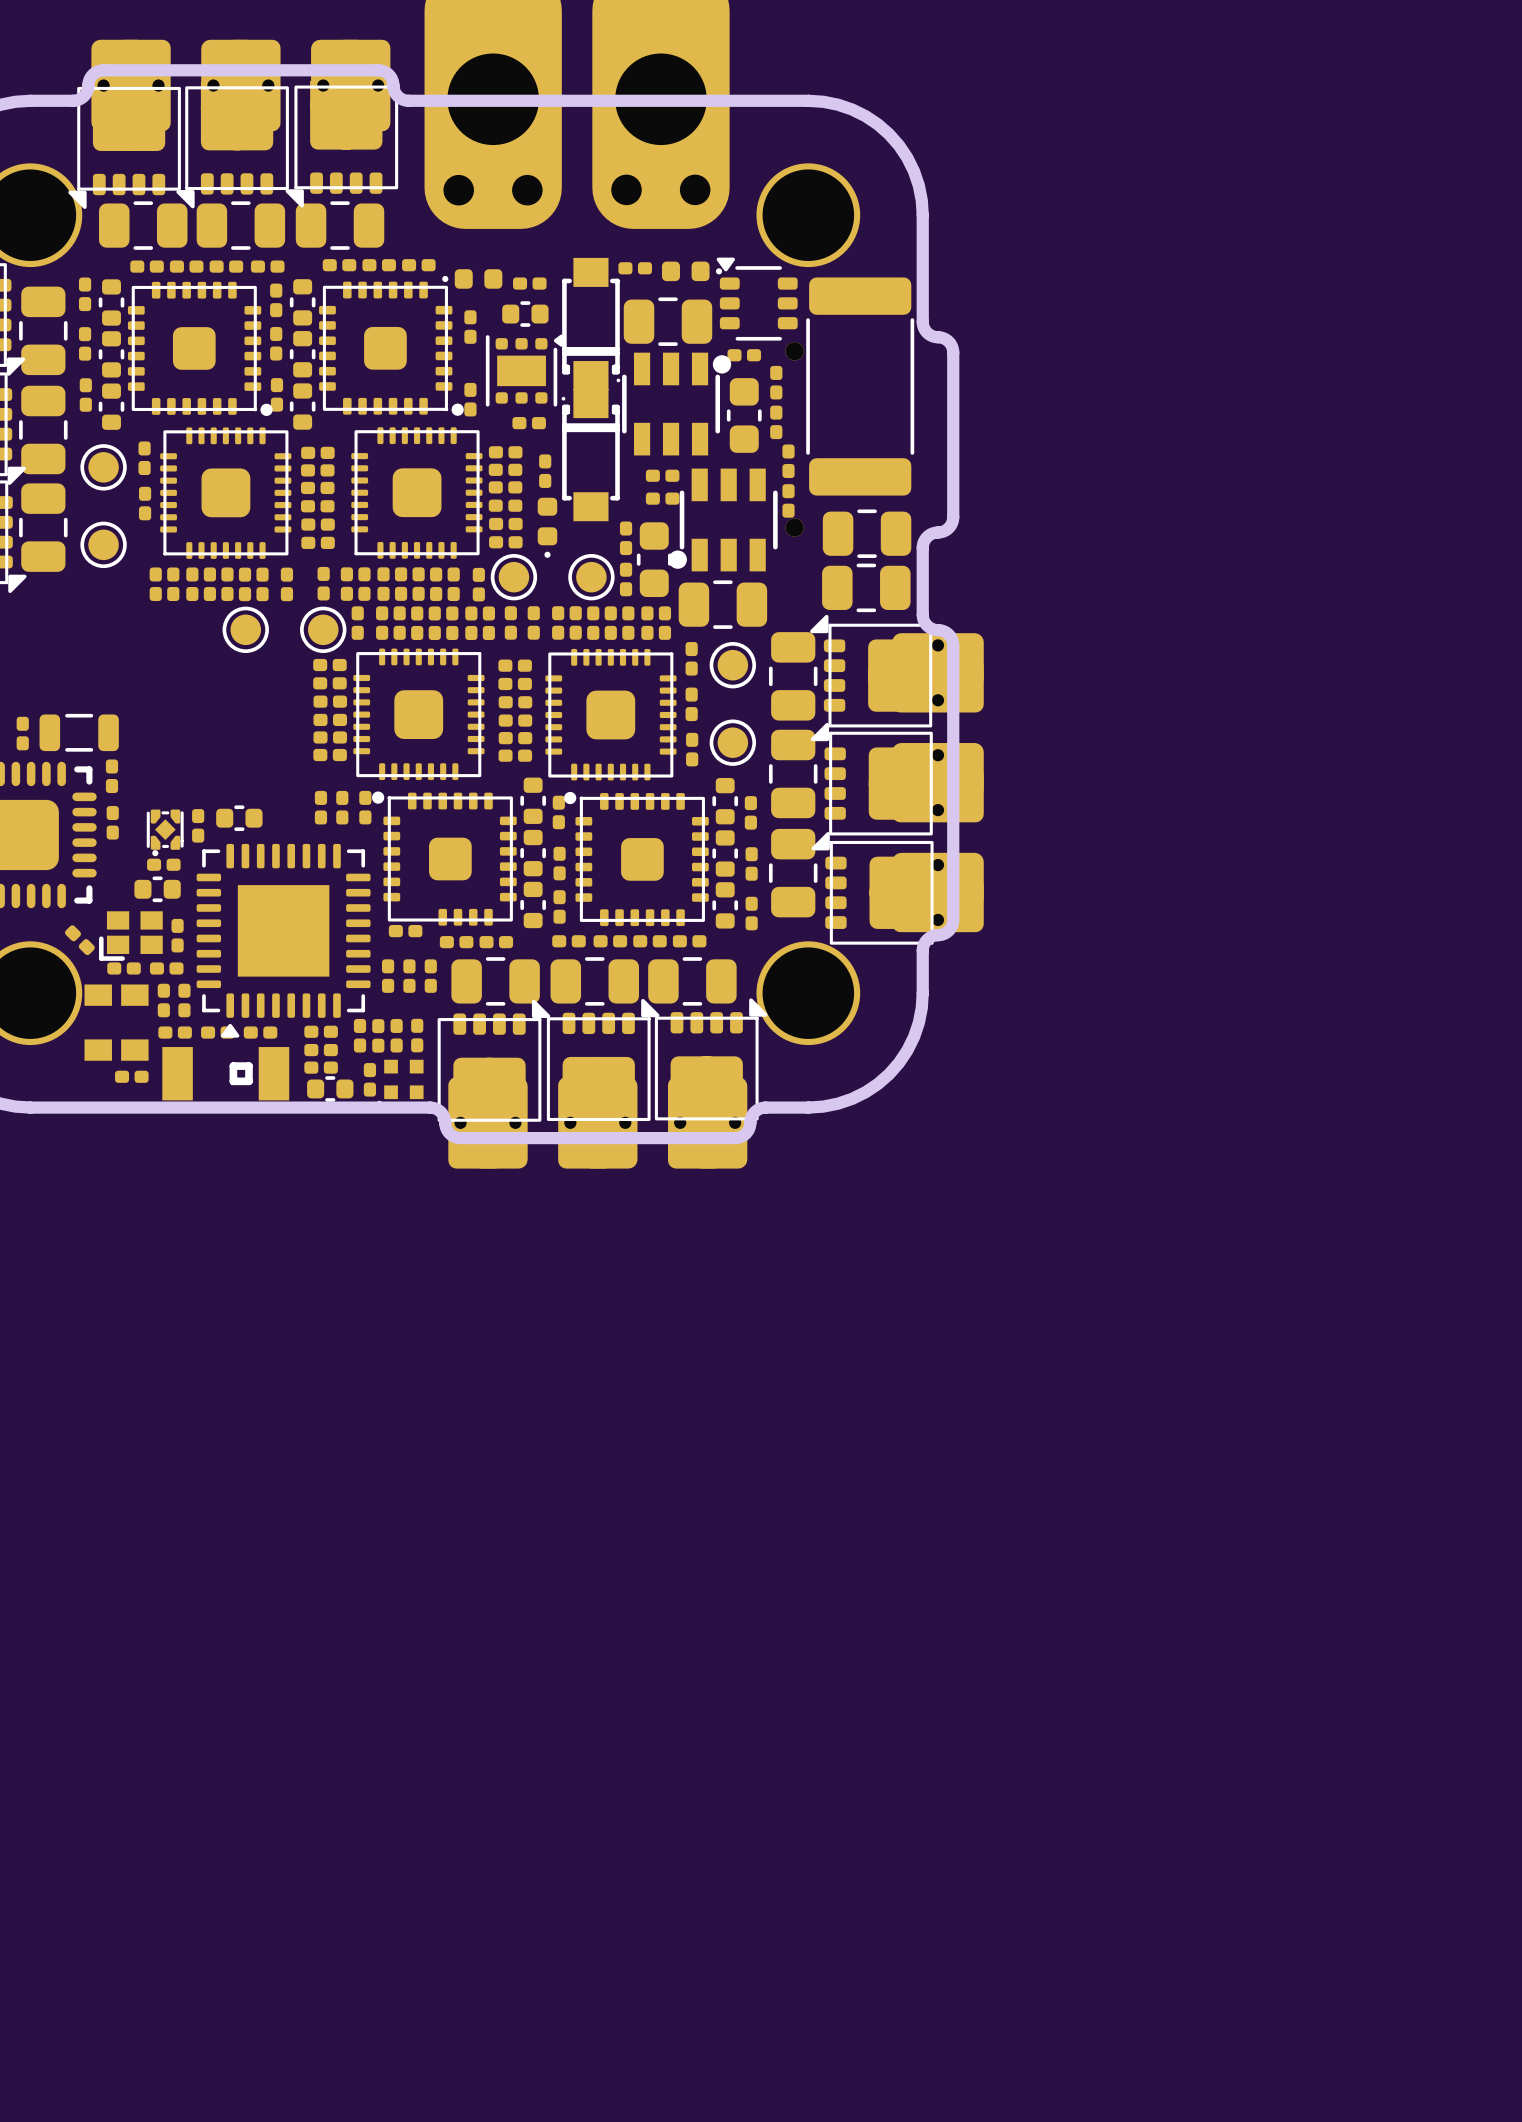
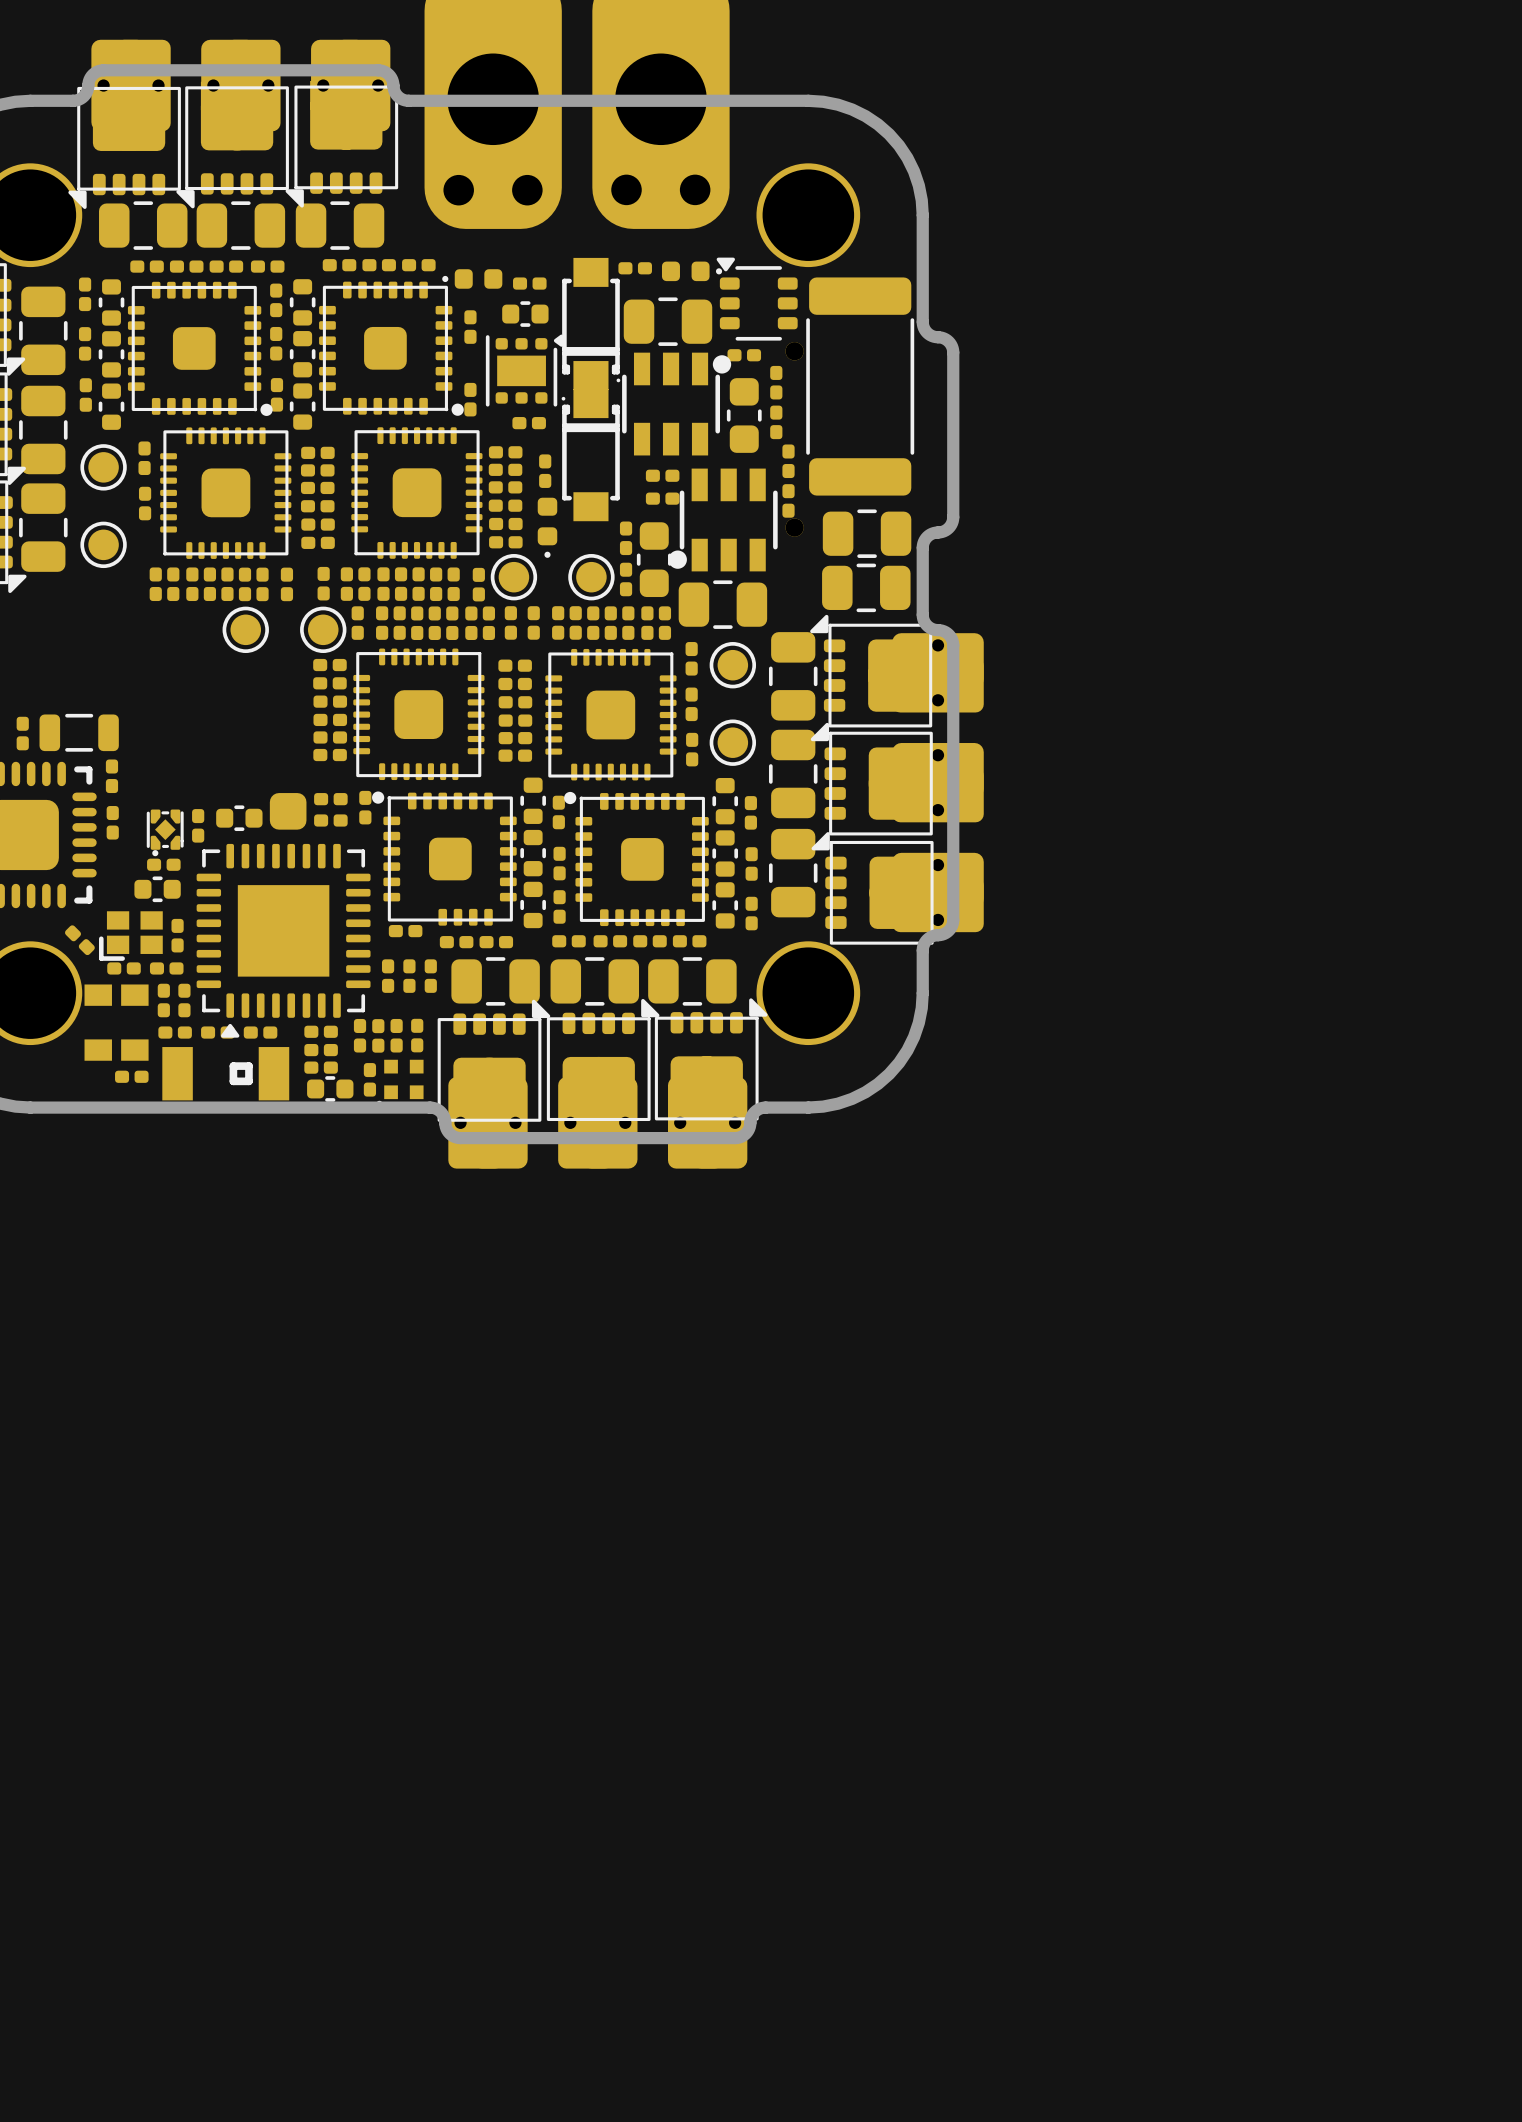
part: none -> (330, 799)
part: (320, 807) -> none
part: (342, 807) -> none
part: none -> (288, 811)
part: none -> (330, 820)

